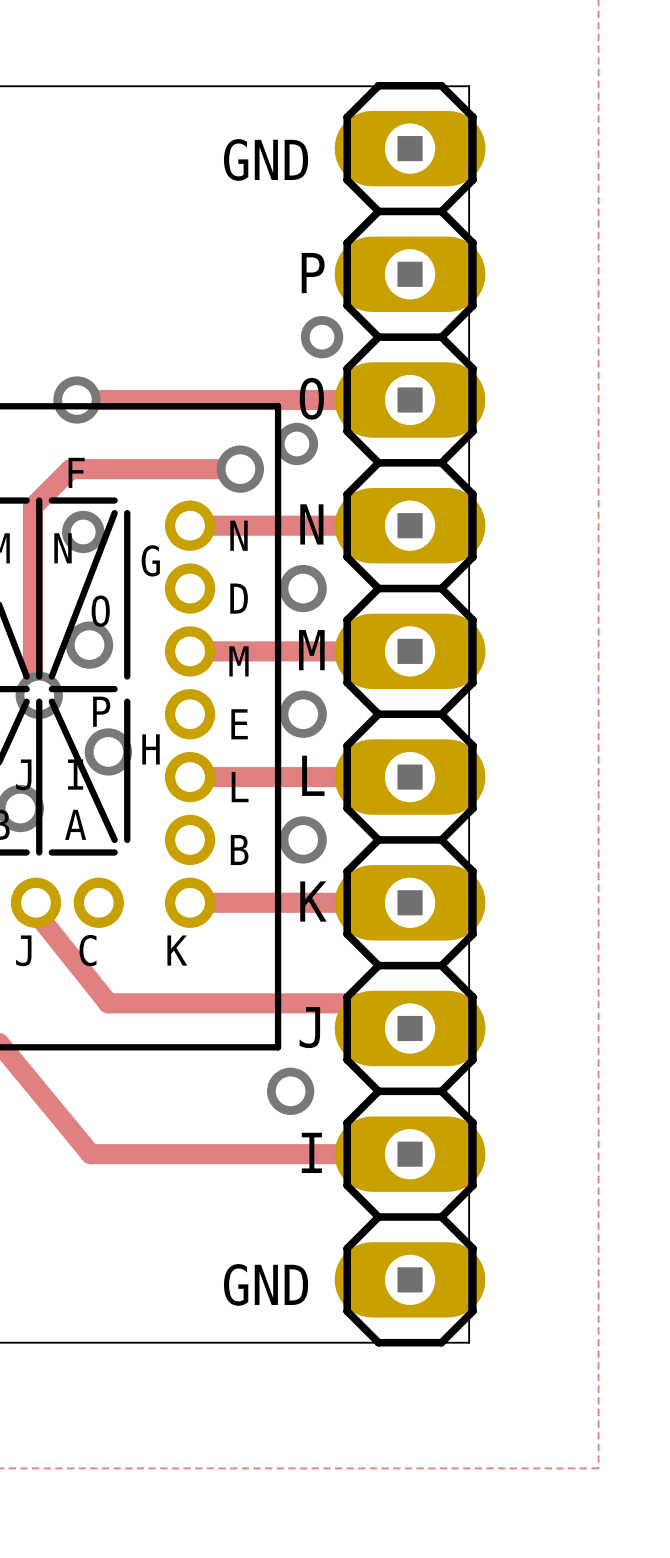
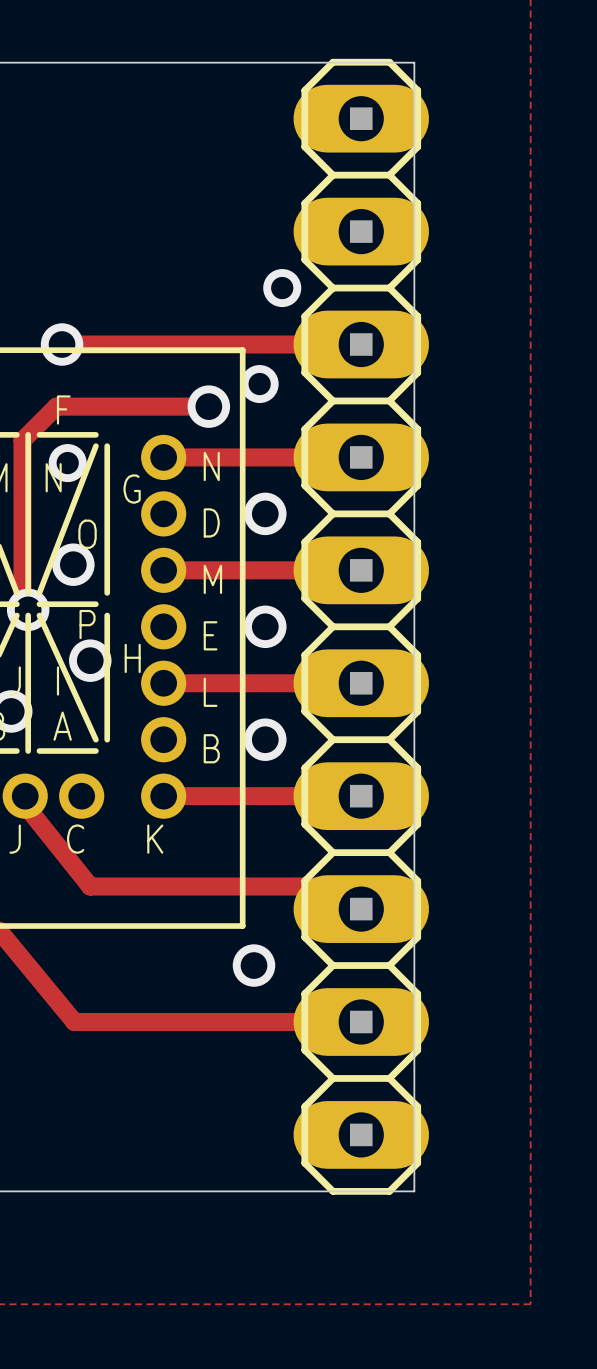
text: GND (266, 159) -> none
text: P (313, 273) -> none
text: O (311, 398) -> none
text: N (311, 524) -> none
text: M (311, 650) -> none
text: L (313, 775) -> none
text: K (313, 901) -> none
text: J (309, 1027) -> none
text: I (311, 1152) -> none
text: GND (266, 1284) -> none

